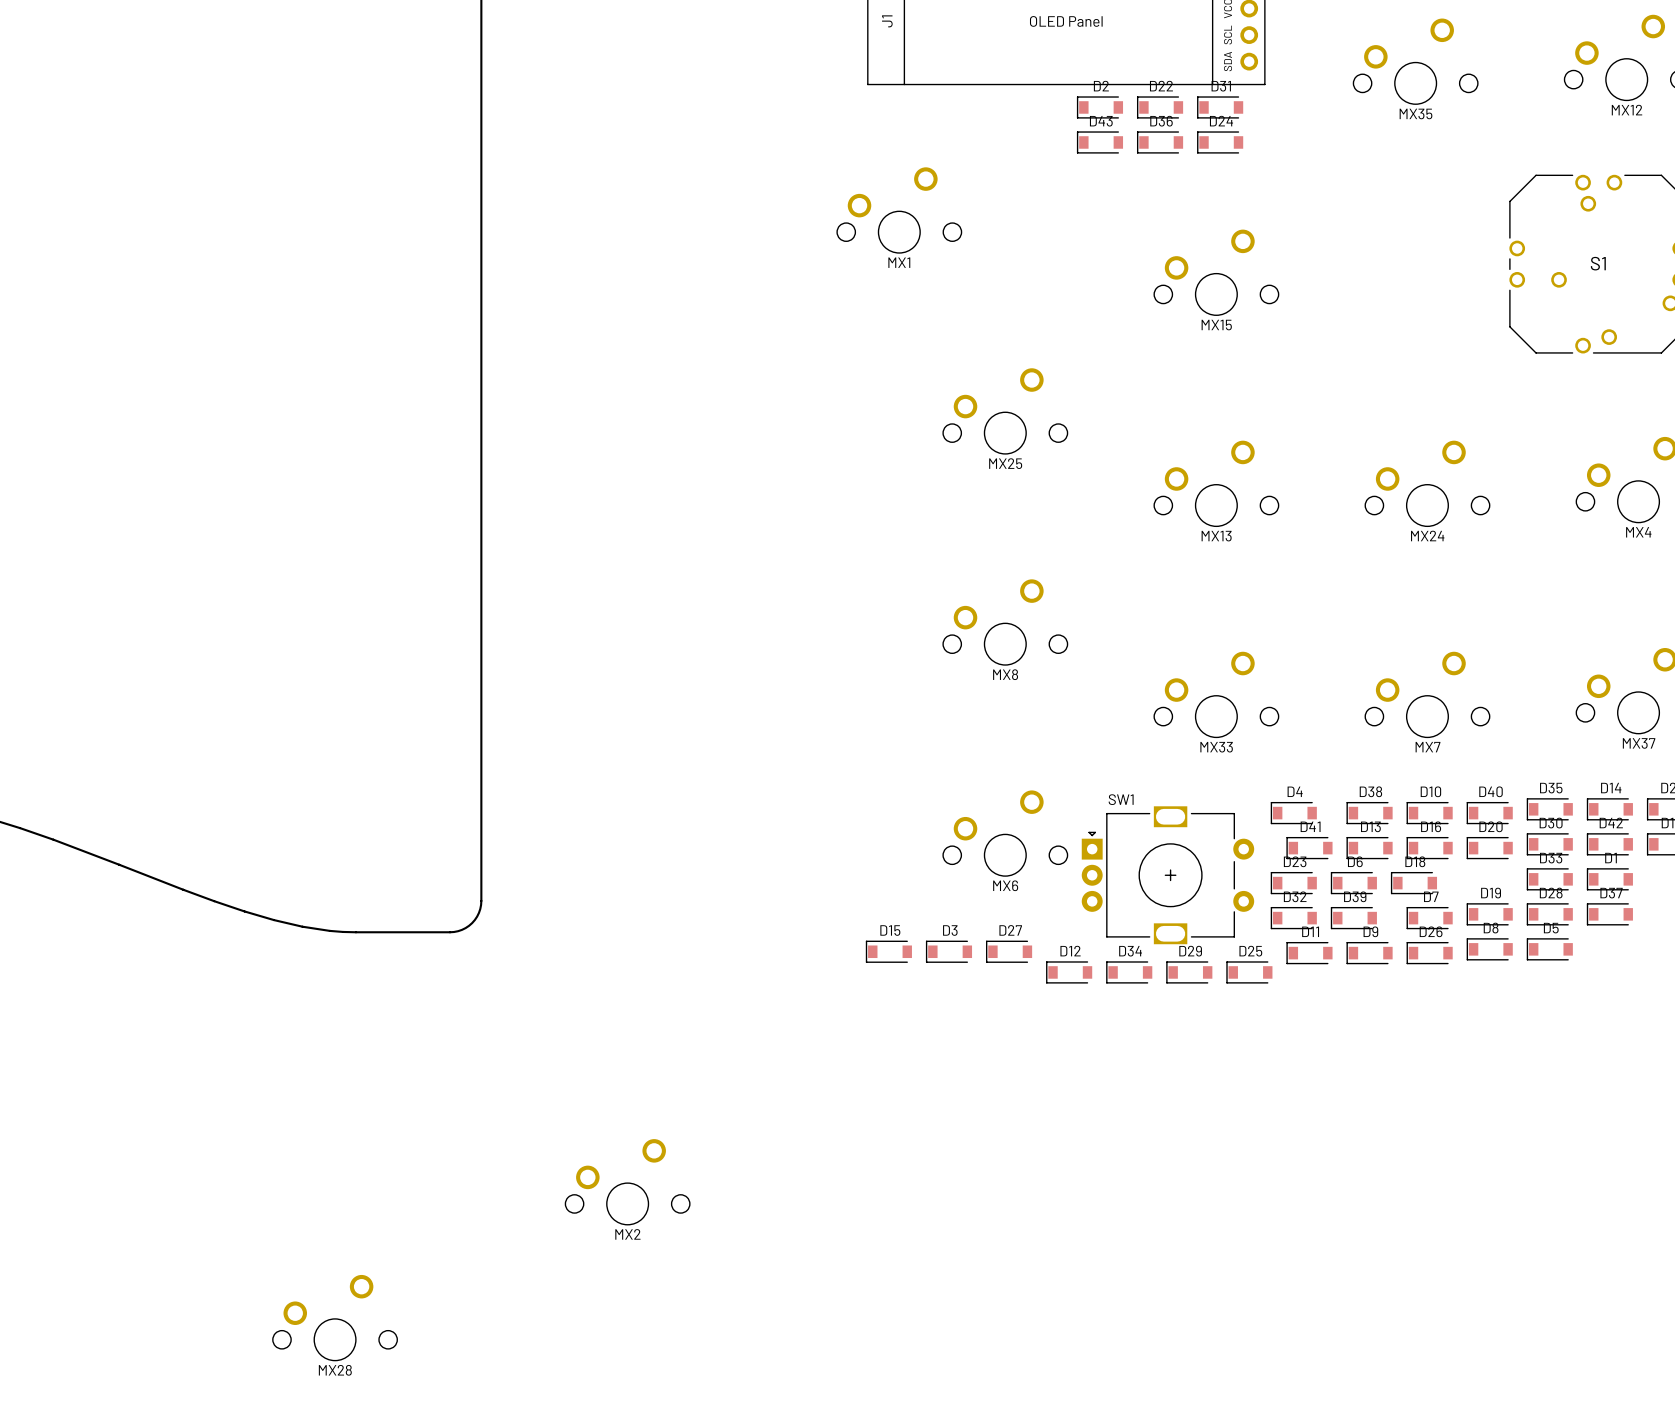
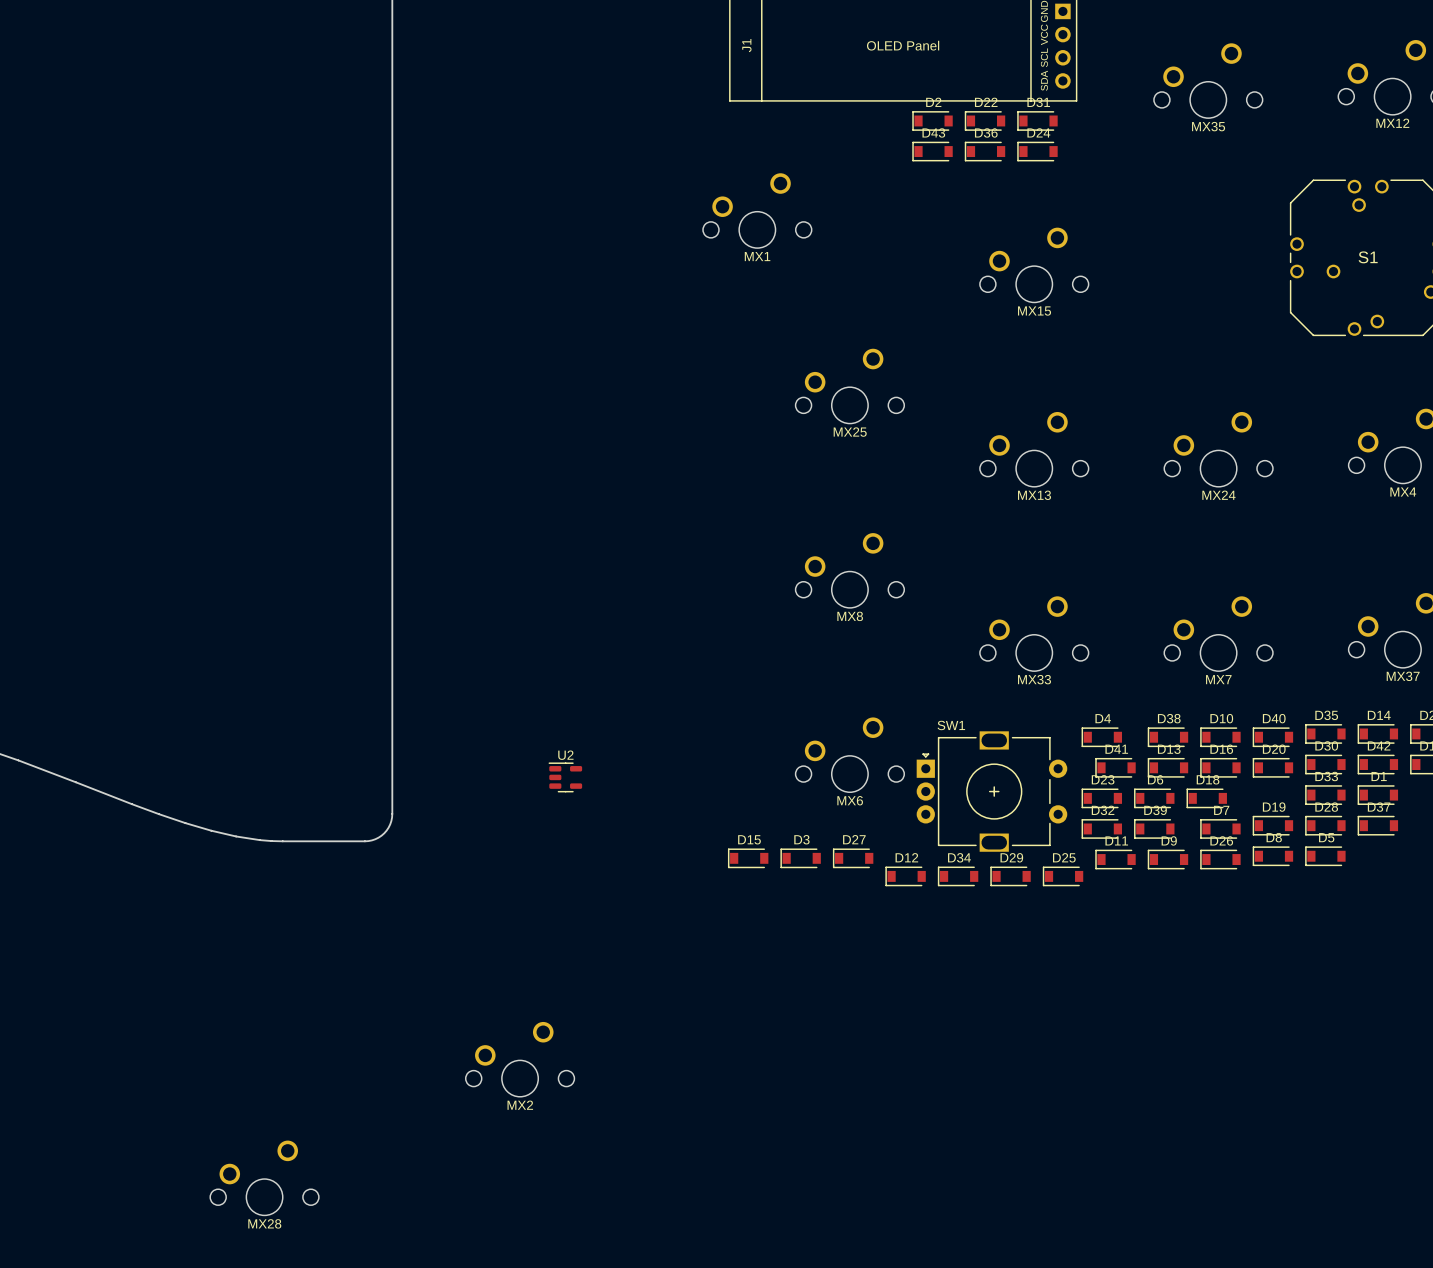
U2: none -> (565, 777)

